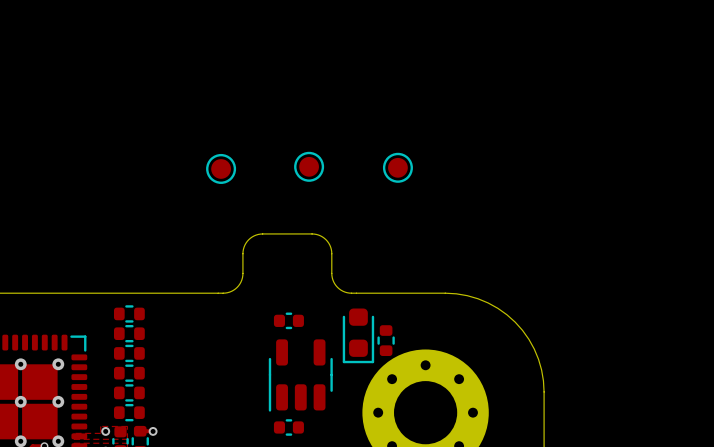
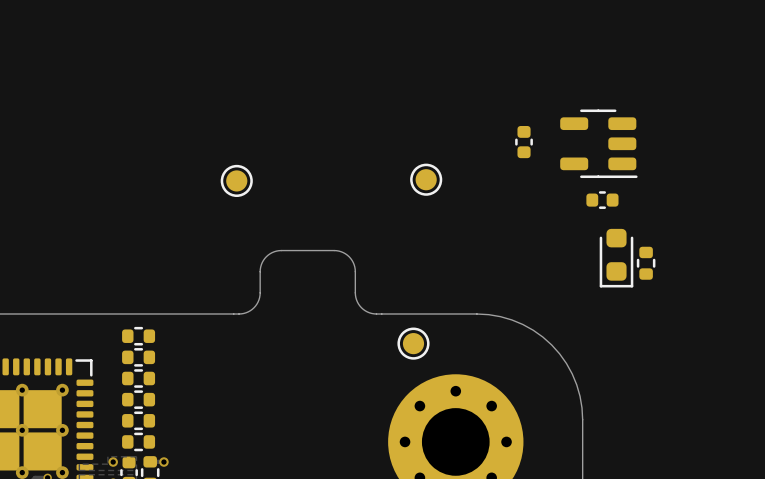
part: none -> (524, 142)
part position: (309, 166) -> (413, 343)
part: none -> (602, 200)
part: (288, 320) -> none
part position: (358, 335) -> (616, 258)
part position: (386, 340) -> (646, 263)
part rotation: 0° (300, 375) -> 90° counterclockwise (598, 143)
part position: (300, 375) -> (598, 143)
part: (288, 427) -> none

